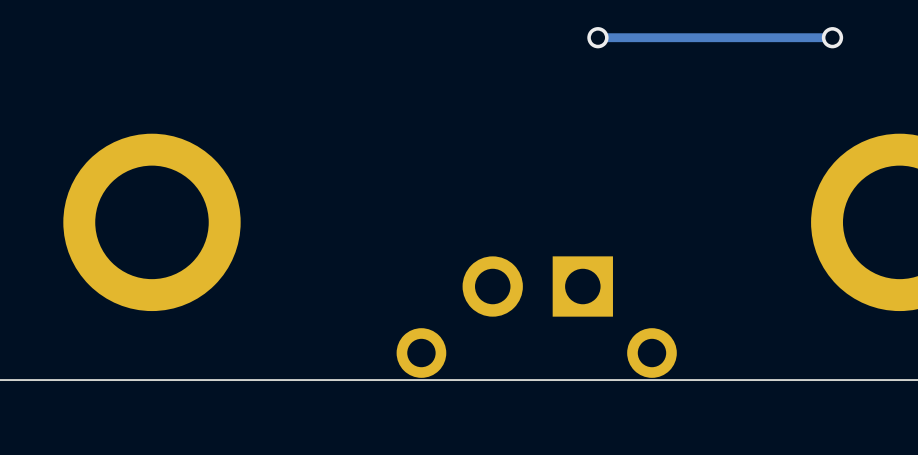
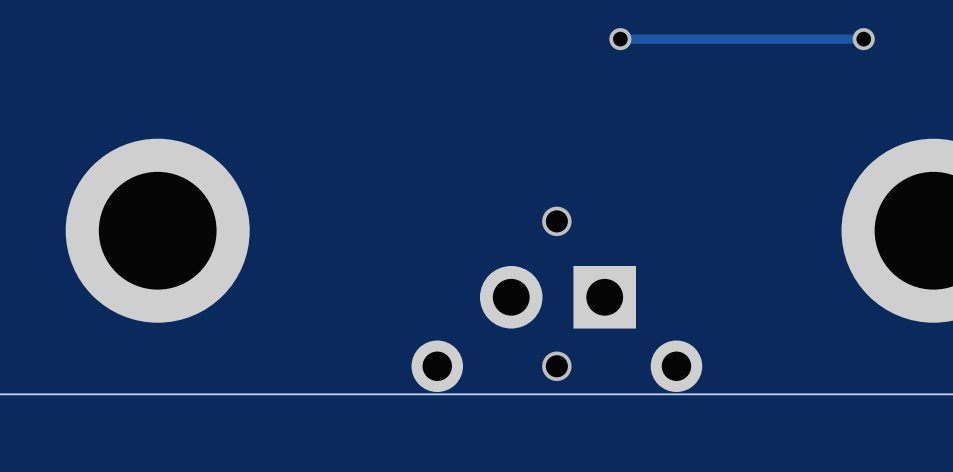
via: none -> (556, 221)
via: none -> (556, 366)

